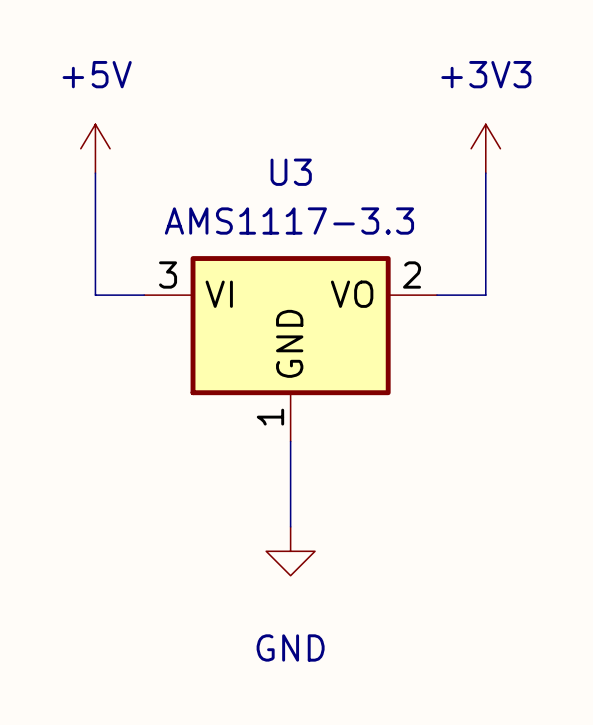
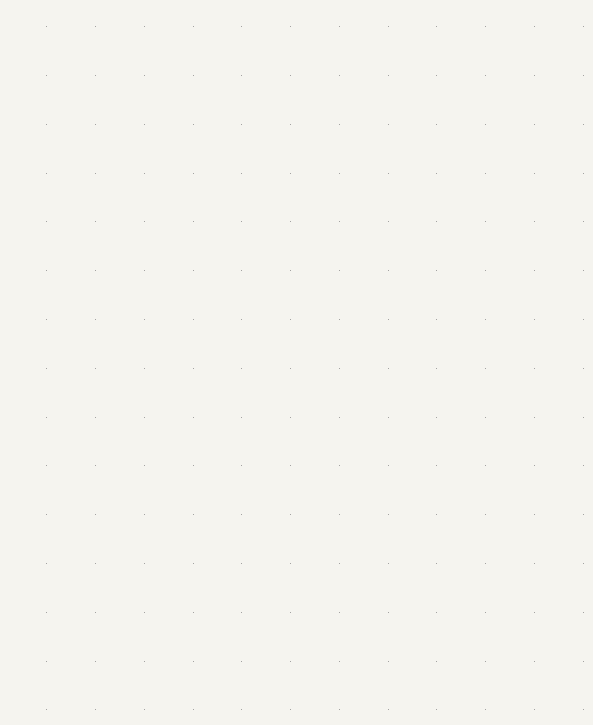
power symbol: +5V (95, 148) -> none
power symbol: +3V3 (485, 148) -> none
wire: (95, 173) (95, 295) (144, 295) -> none
wire: (485, 173) (485, 295) (436, 295) -> none
U3: AMS1117-3.3 (290, 348) -> none
wire: (290, 441) (290, 526) -> none
power symbol: GND (290, 551) -> none

